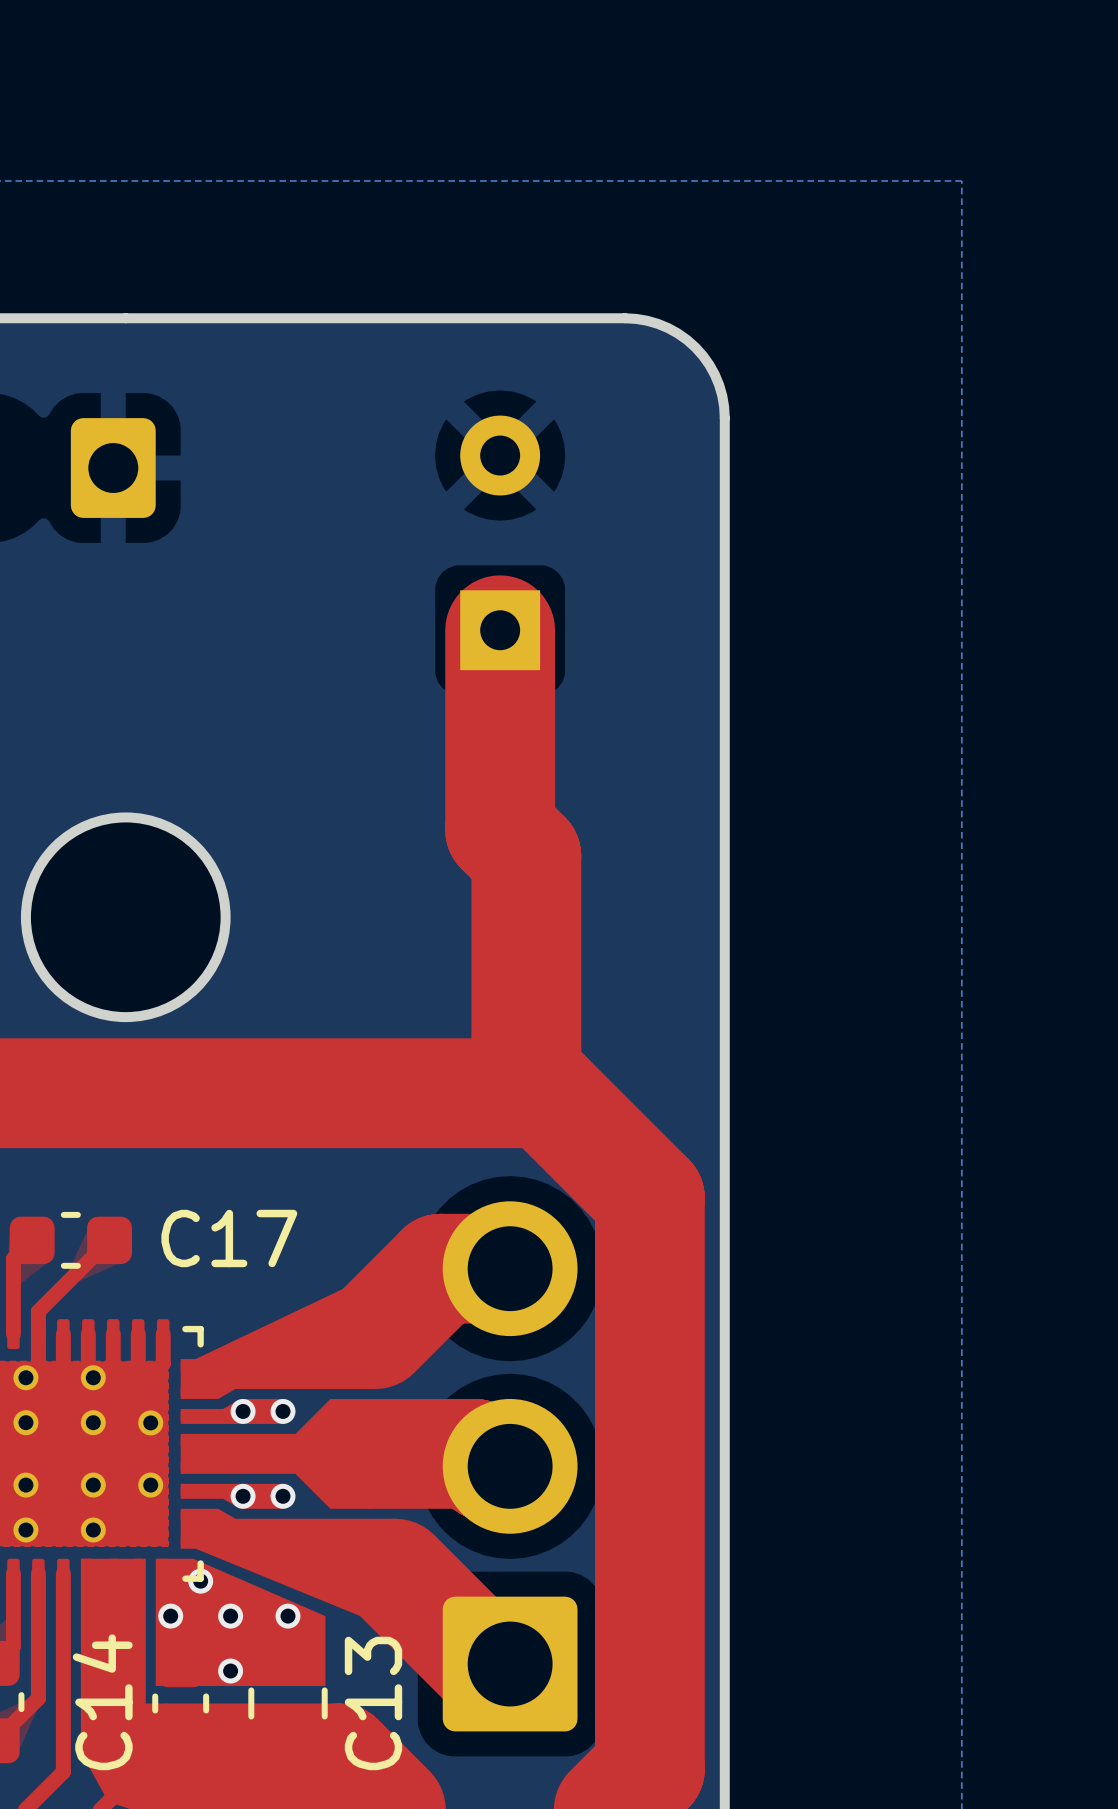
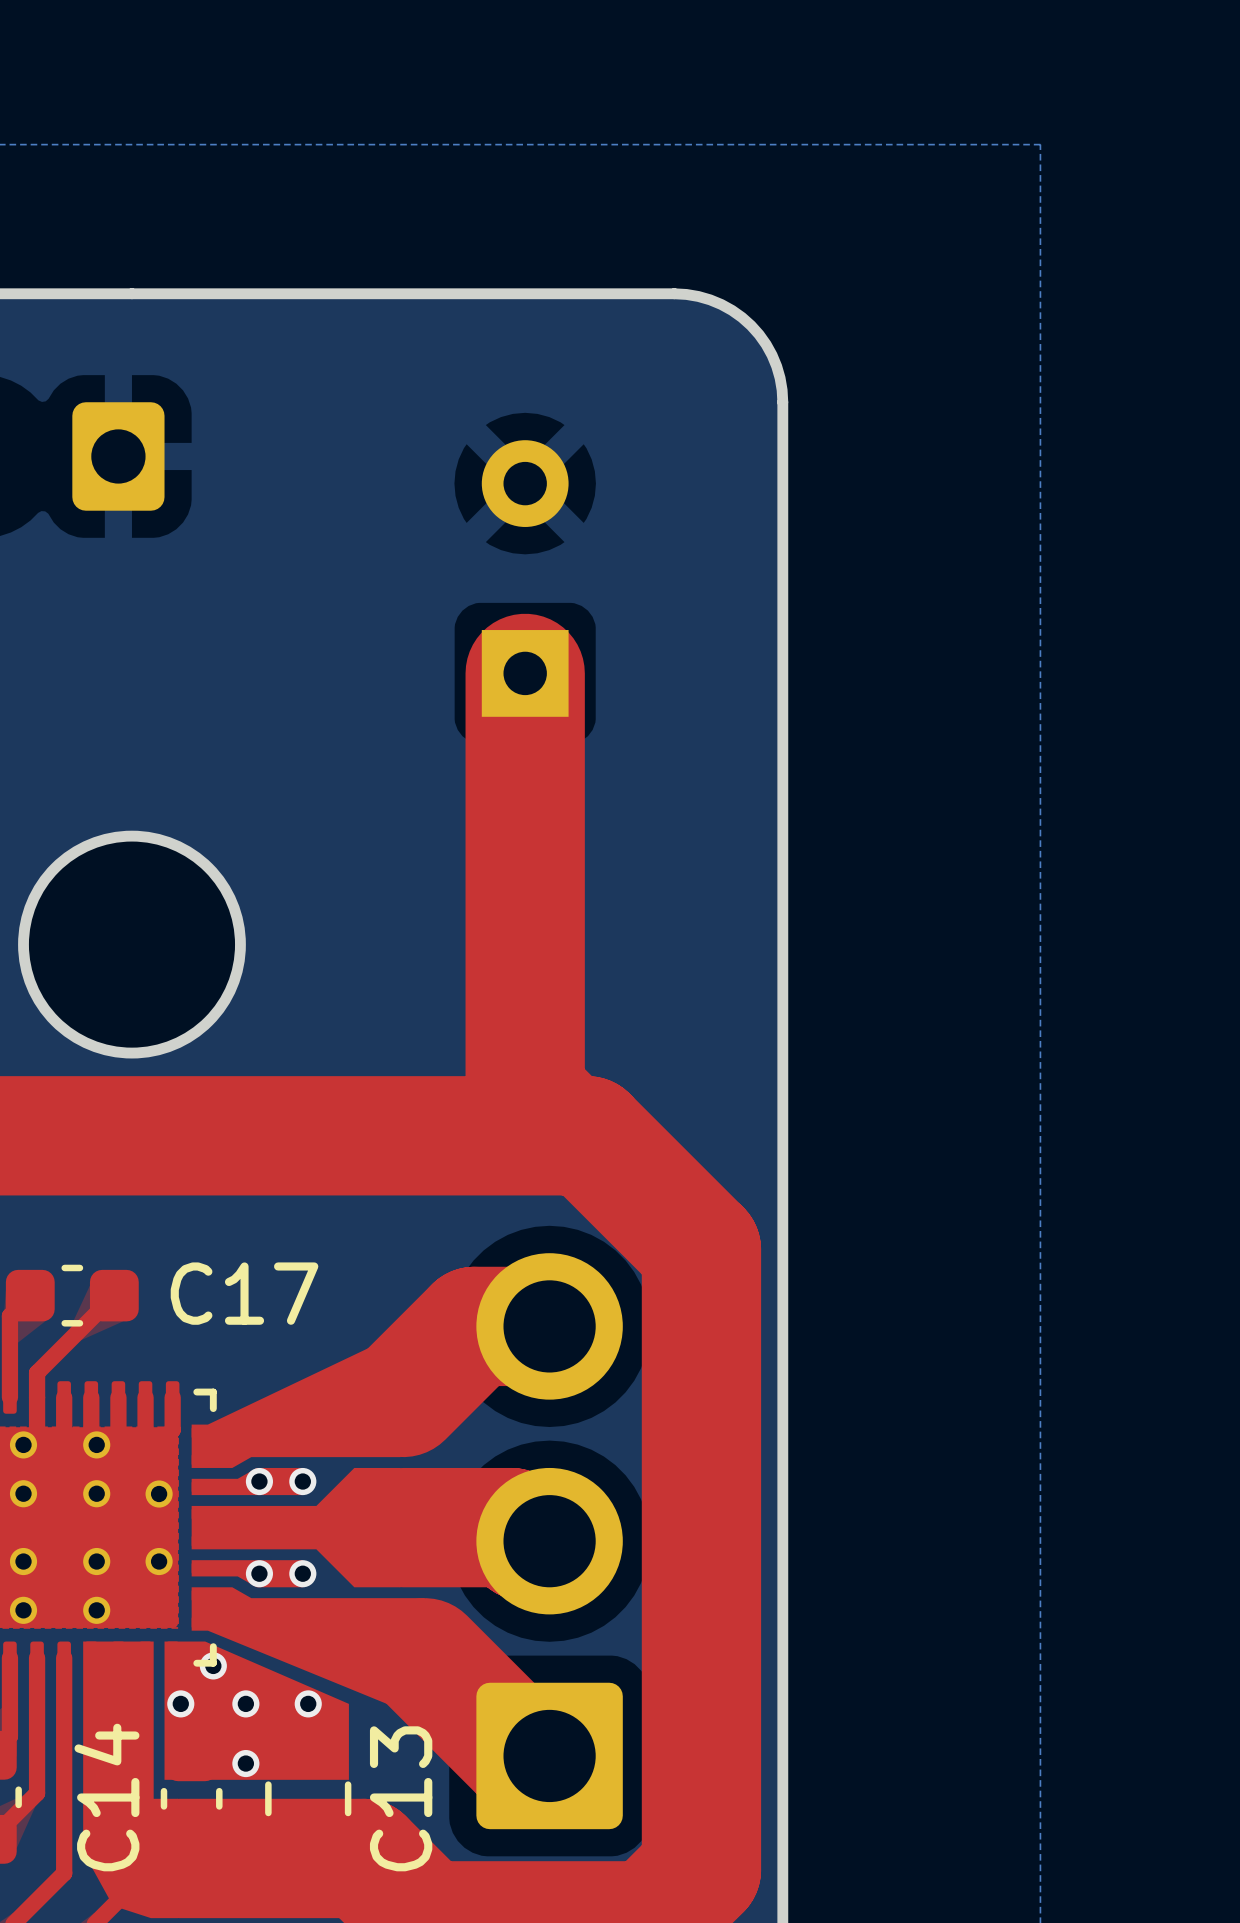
part position: (500, 542) -> (525, 578)
top track: (500, 630) (500, 829) (526, 856) (526, 1093) -> (525, 673) (525, 1093) (567, 1135)

